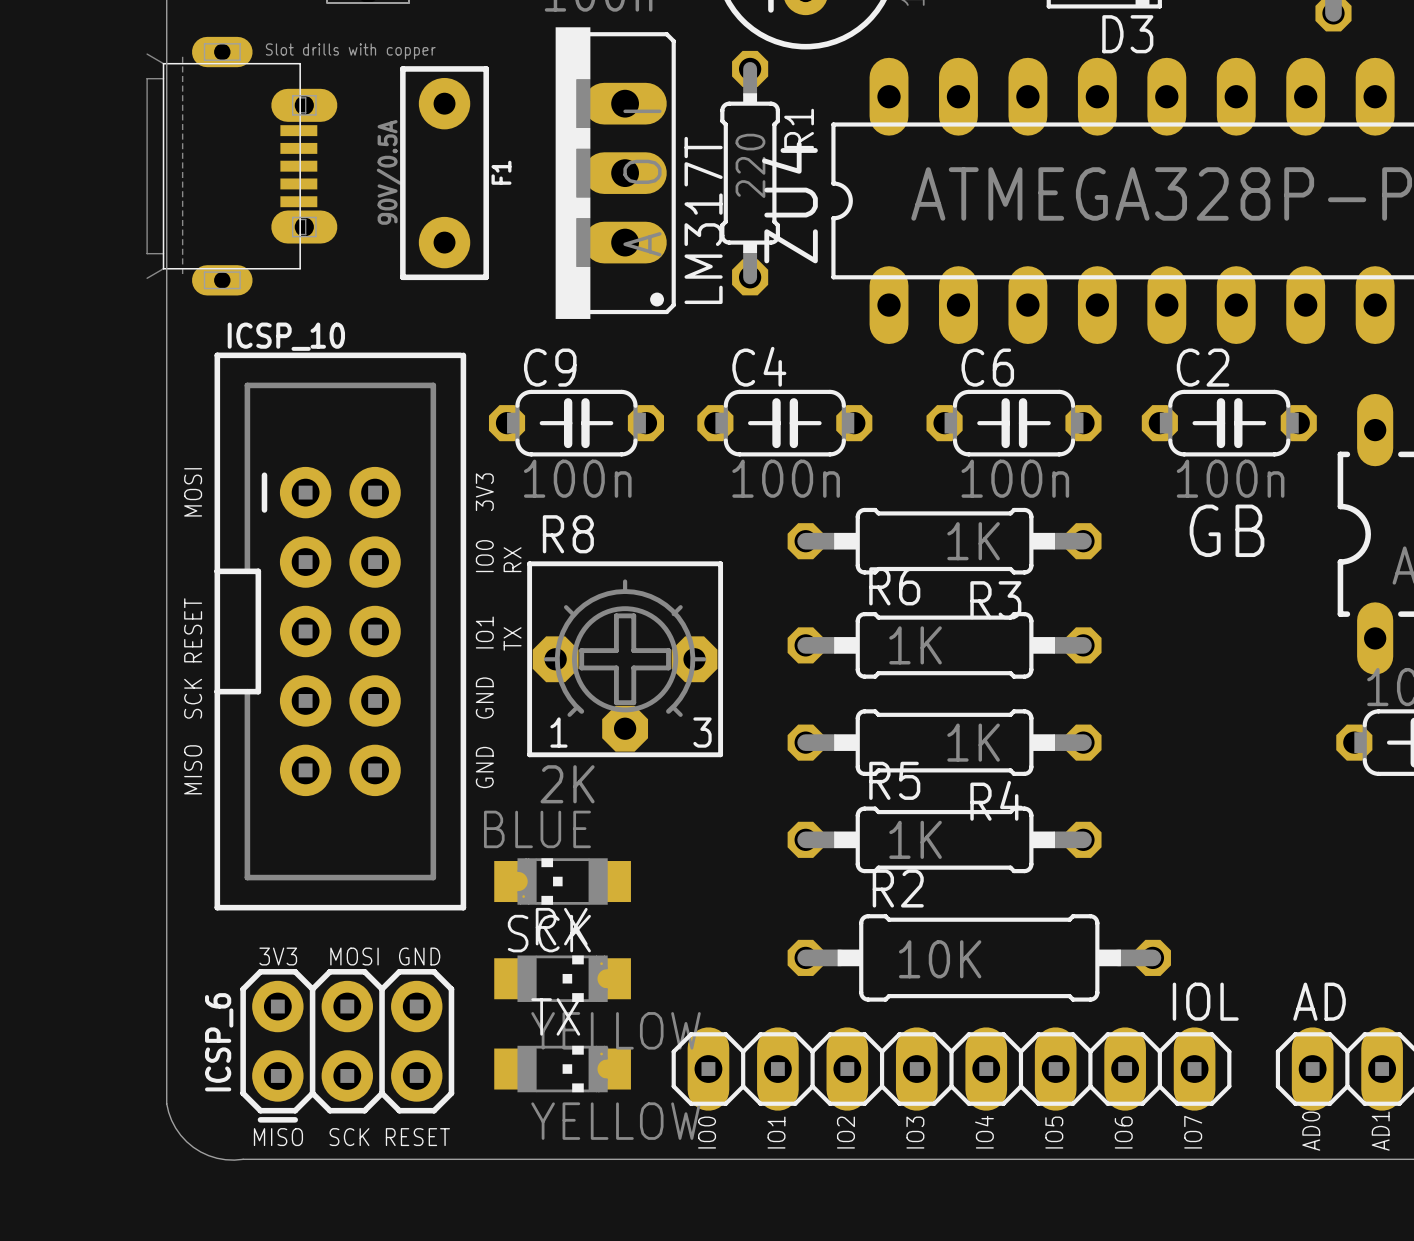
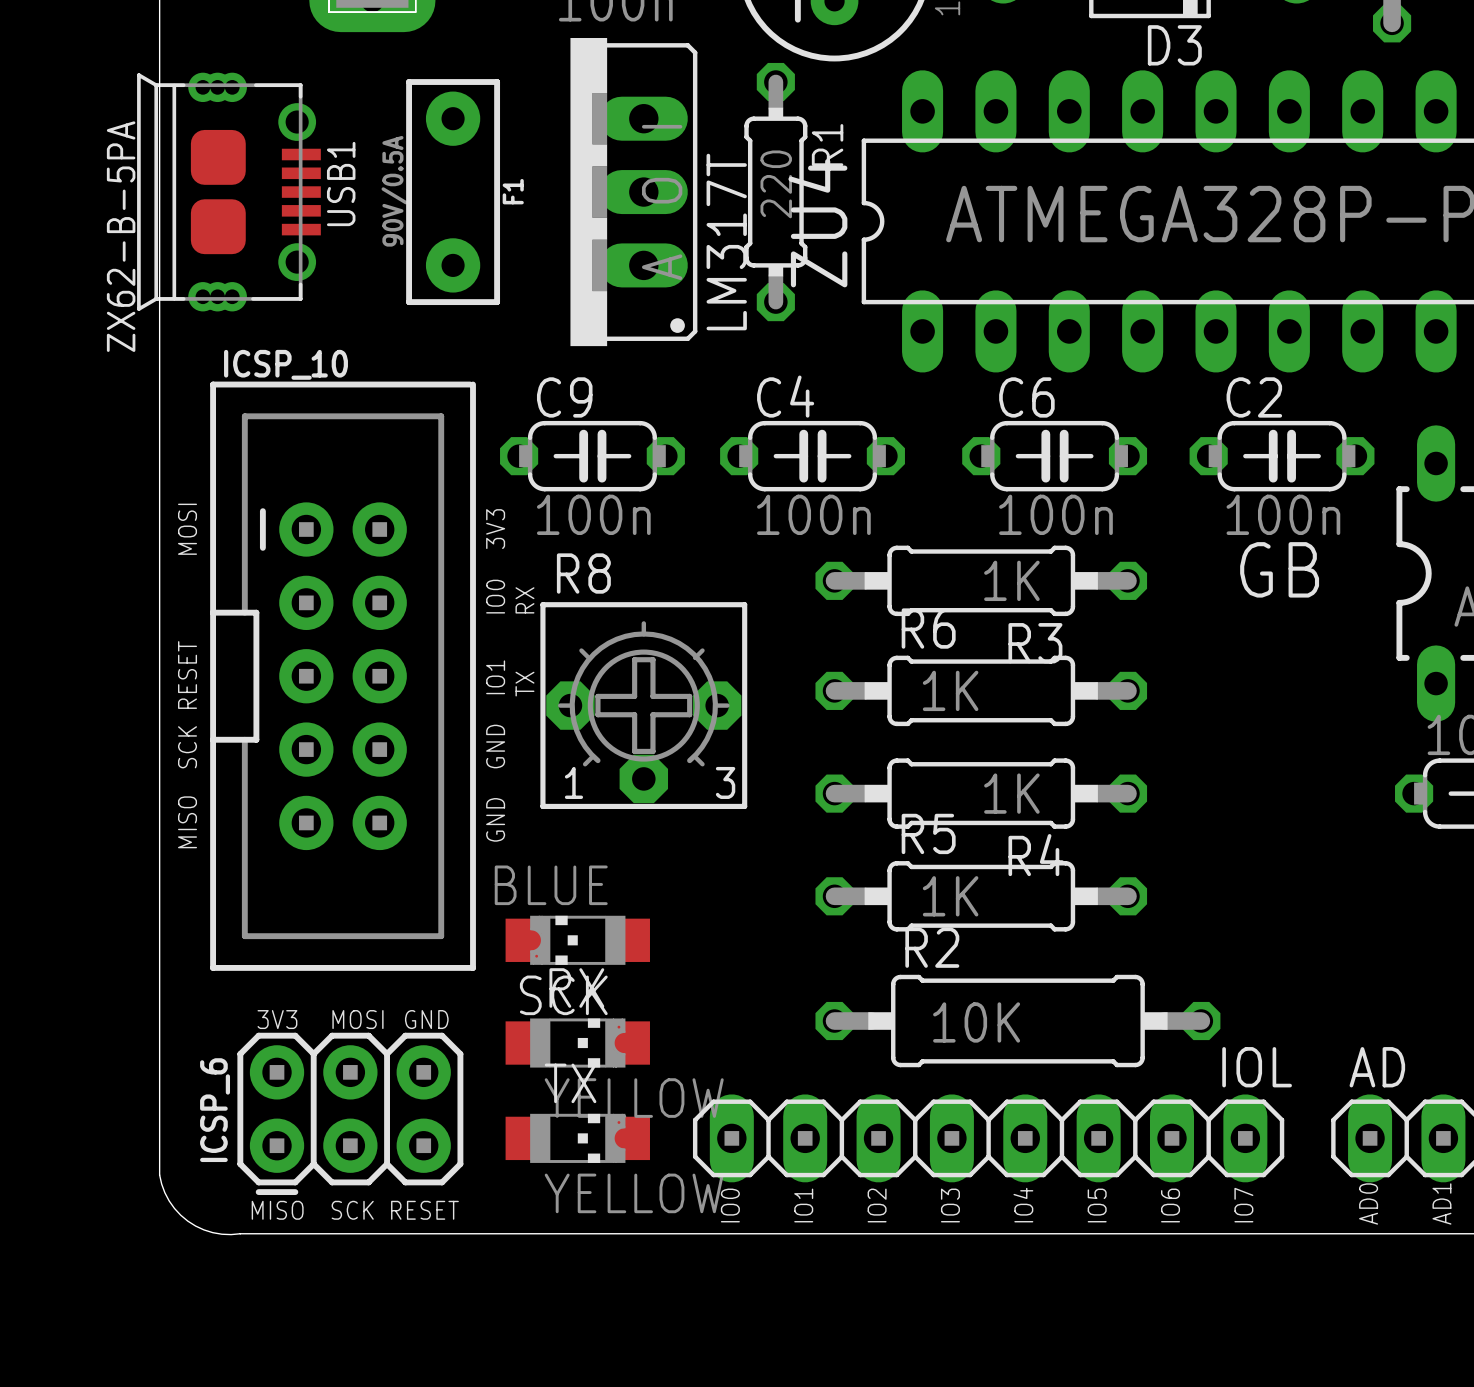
text: Slot drills with copper (350, 51) -> none
part: (241, 166) -> none
USB1: none -> ZX62-B-5PA (228, 192)
R8 value: 2K (567, 784) -> none

